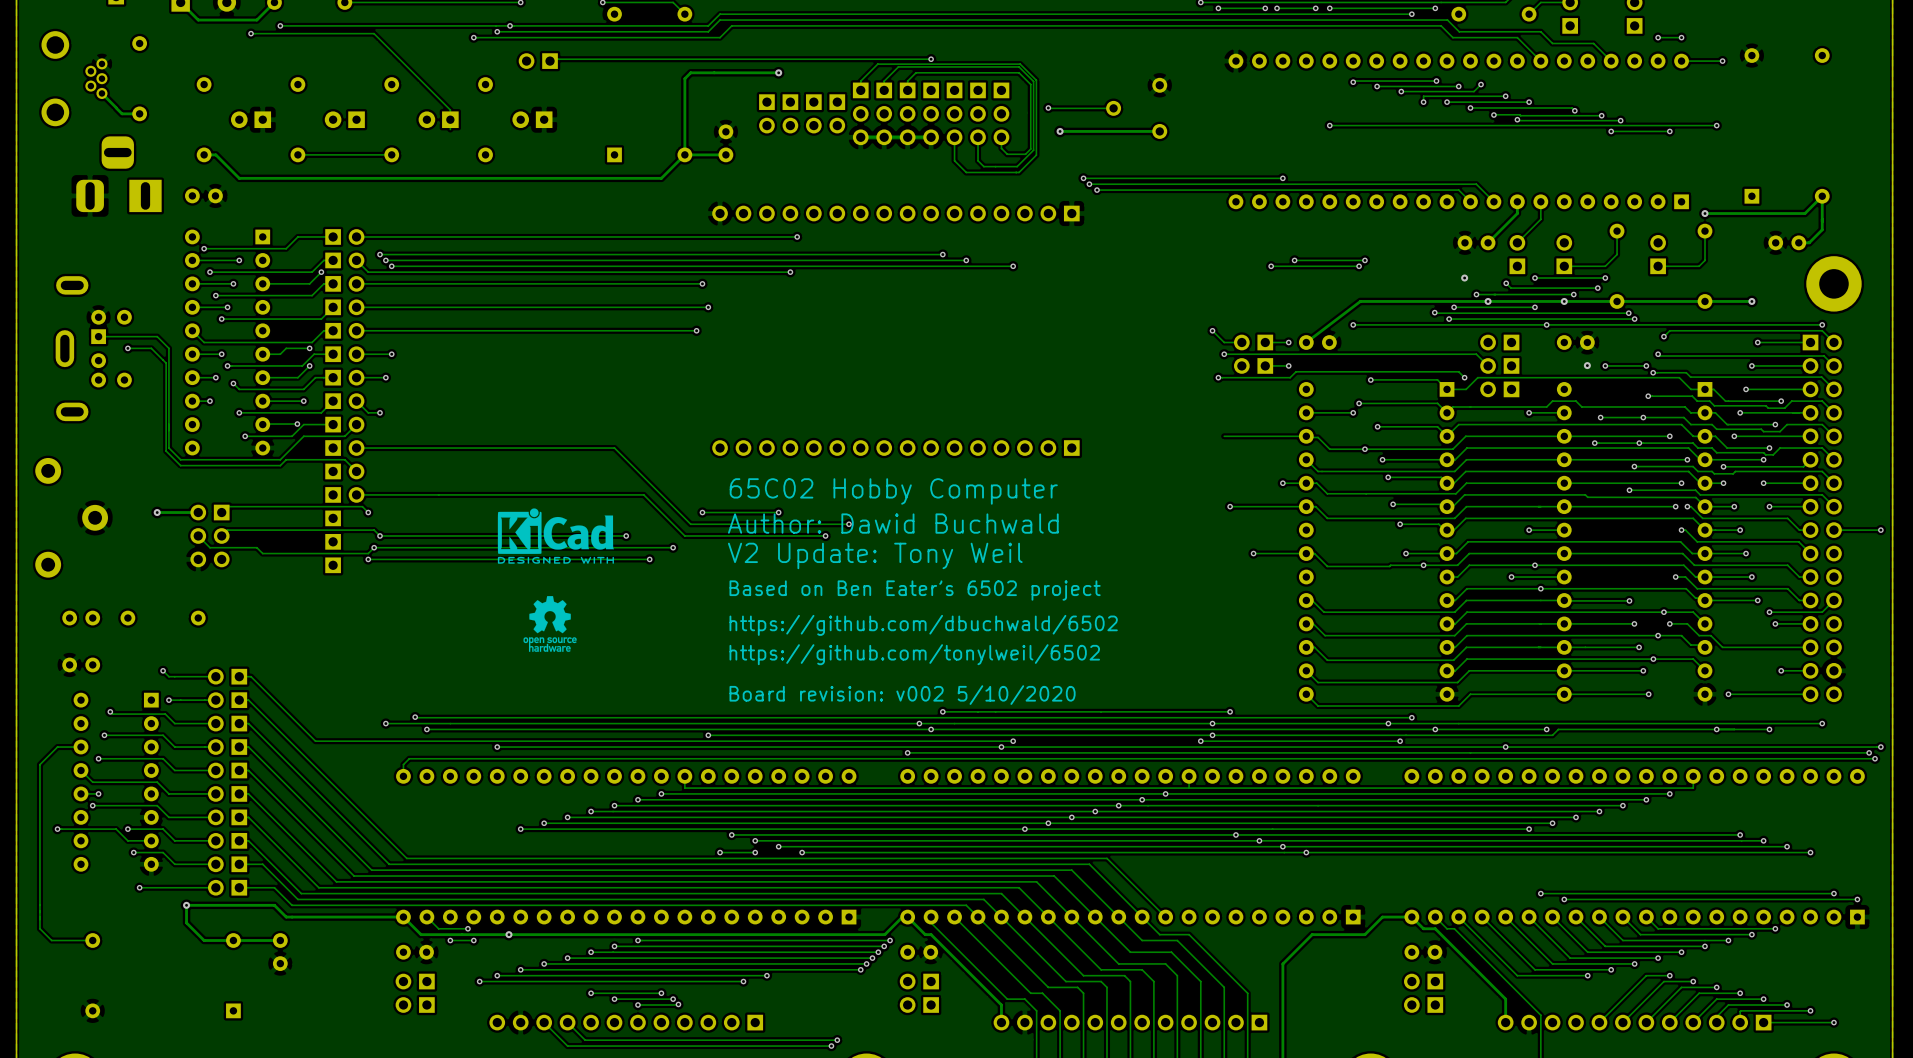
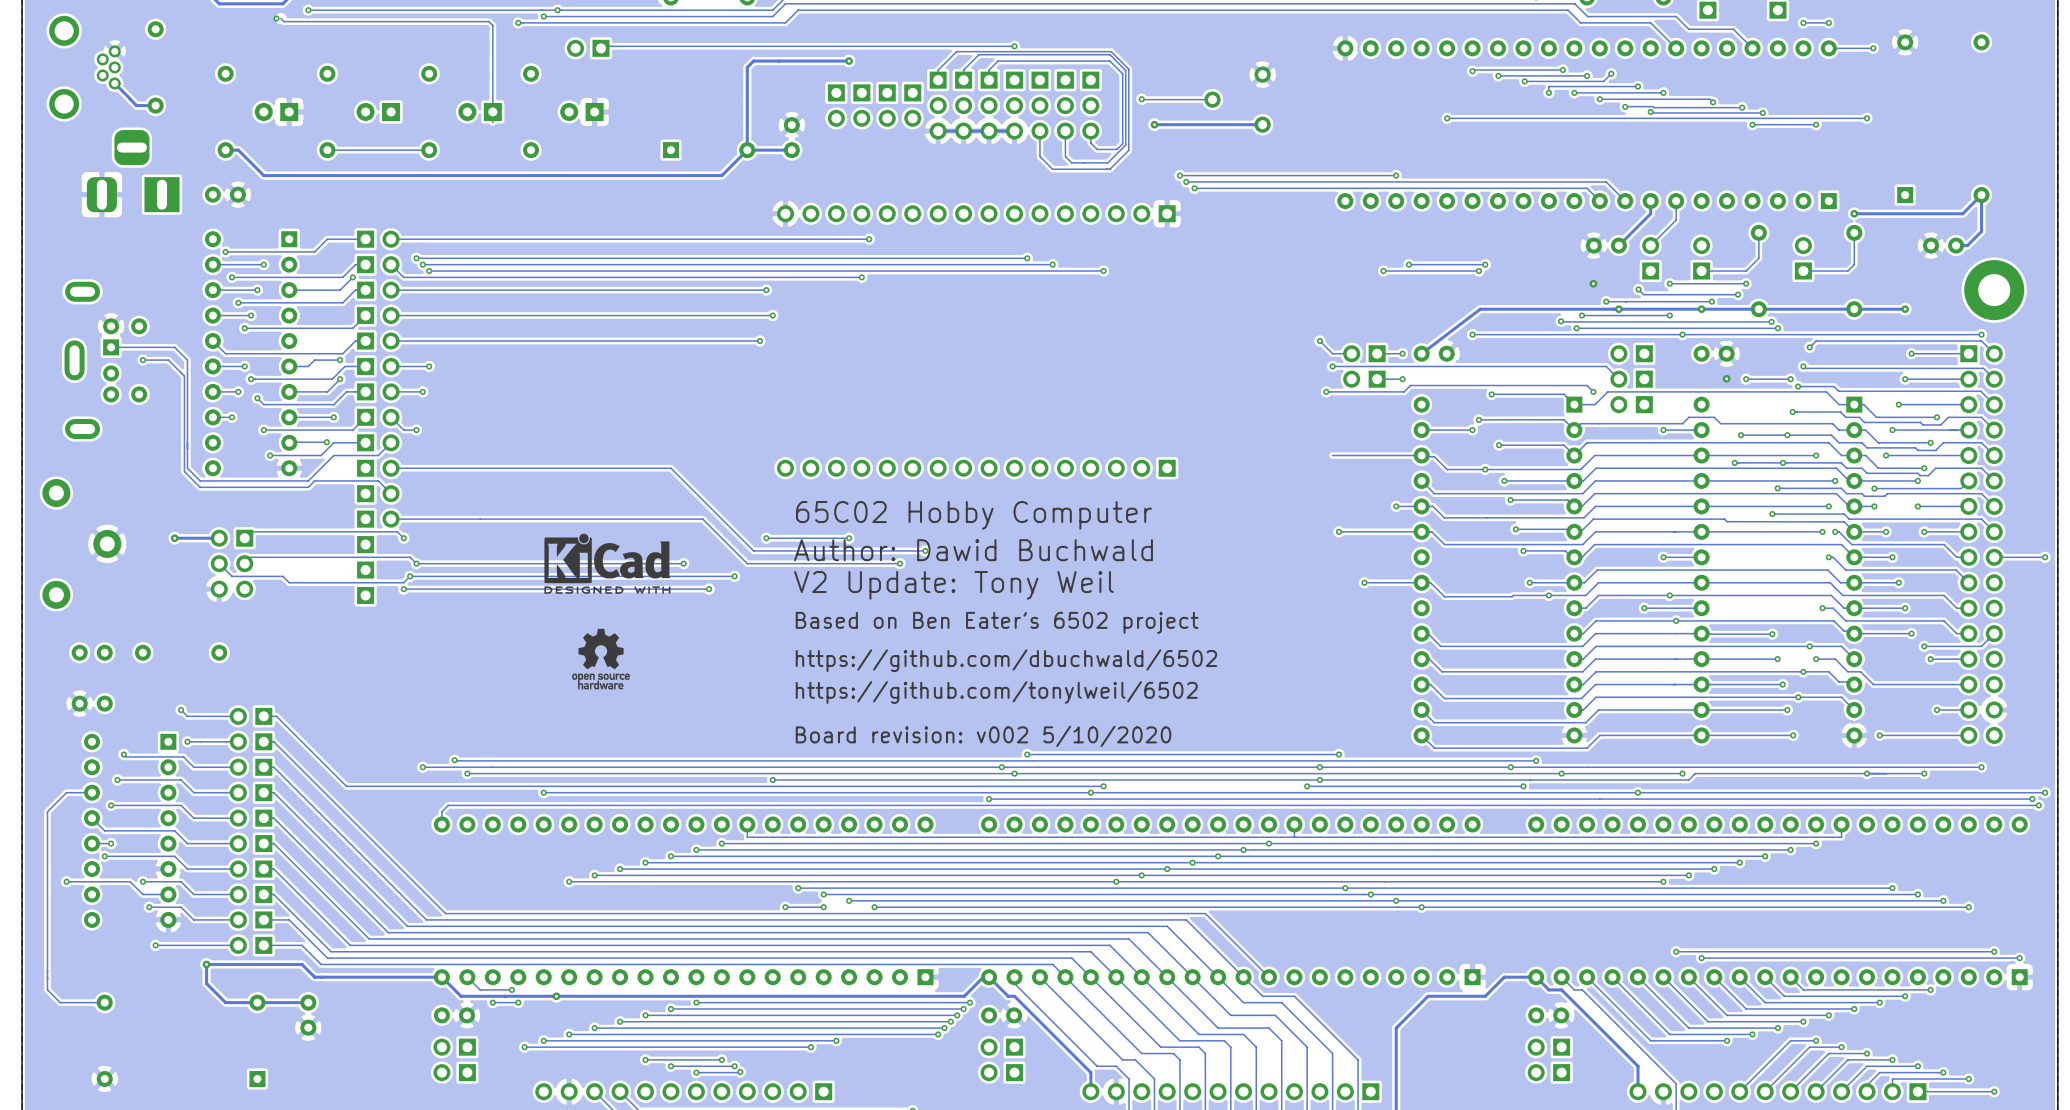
track: (251, 33) (374, 33) (450, 110) -> (280, 18) (283, 21) (489, 21) (492, 25) (492, 101)

